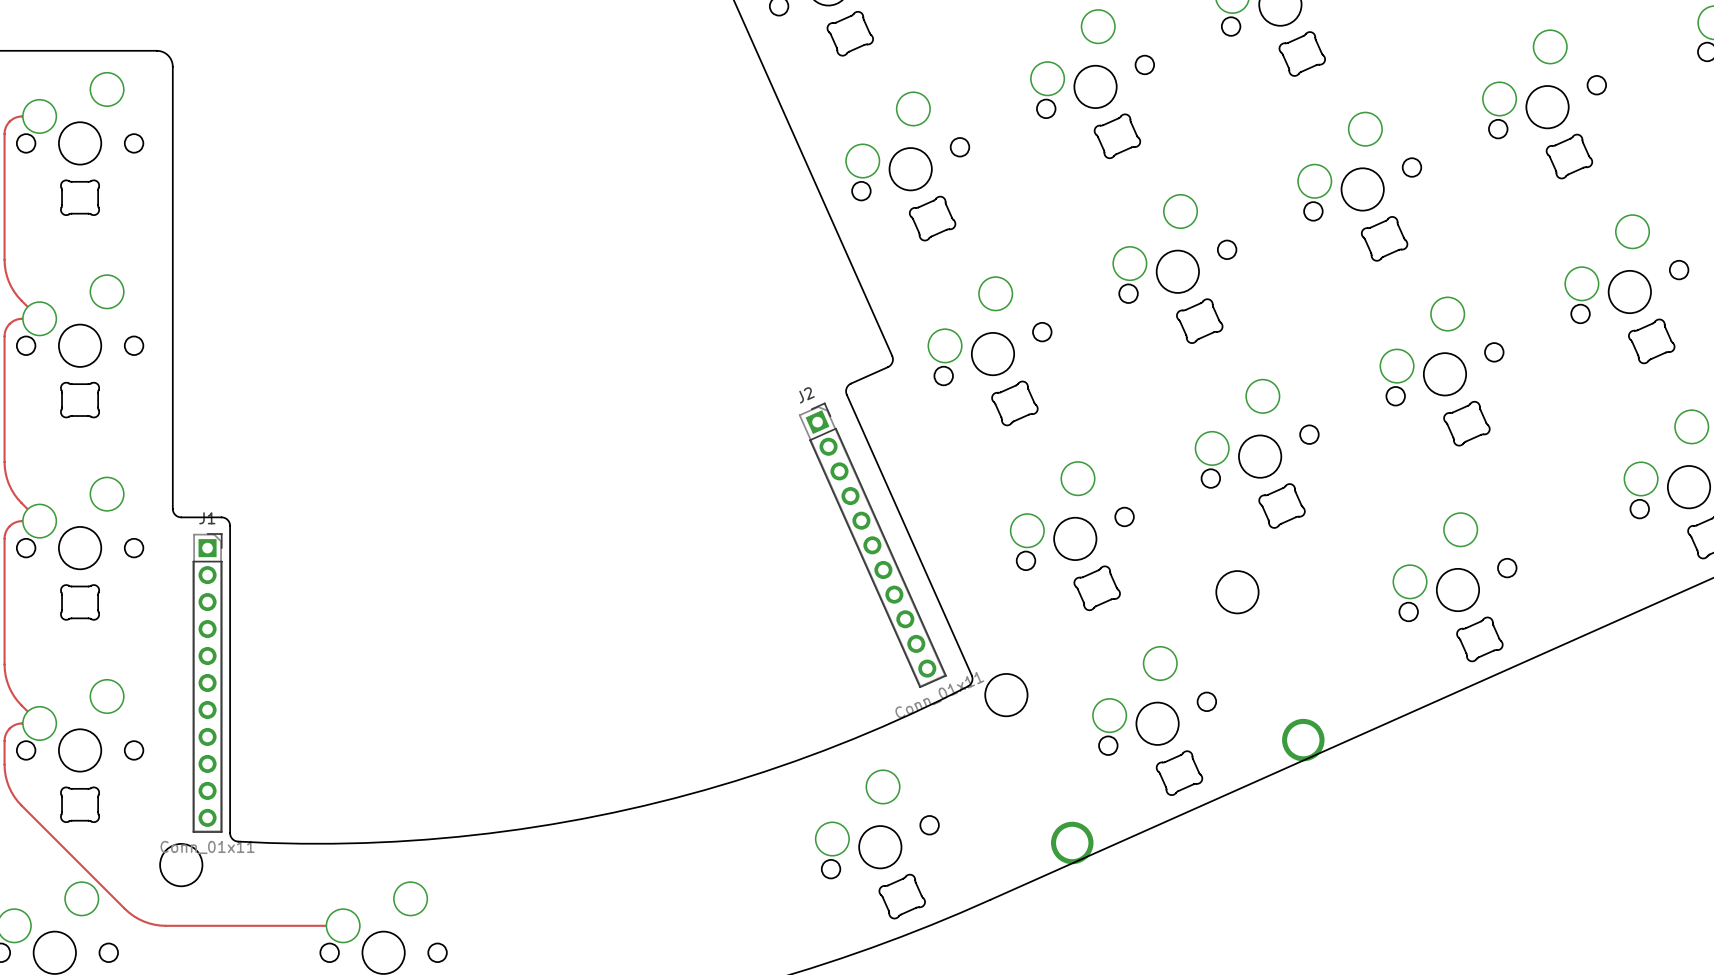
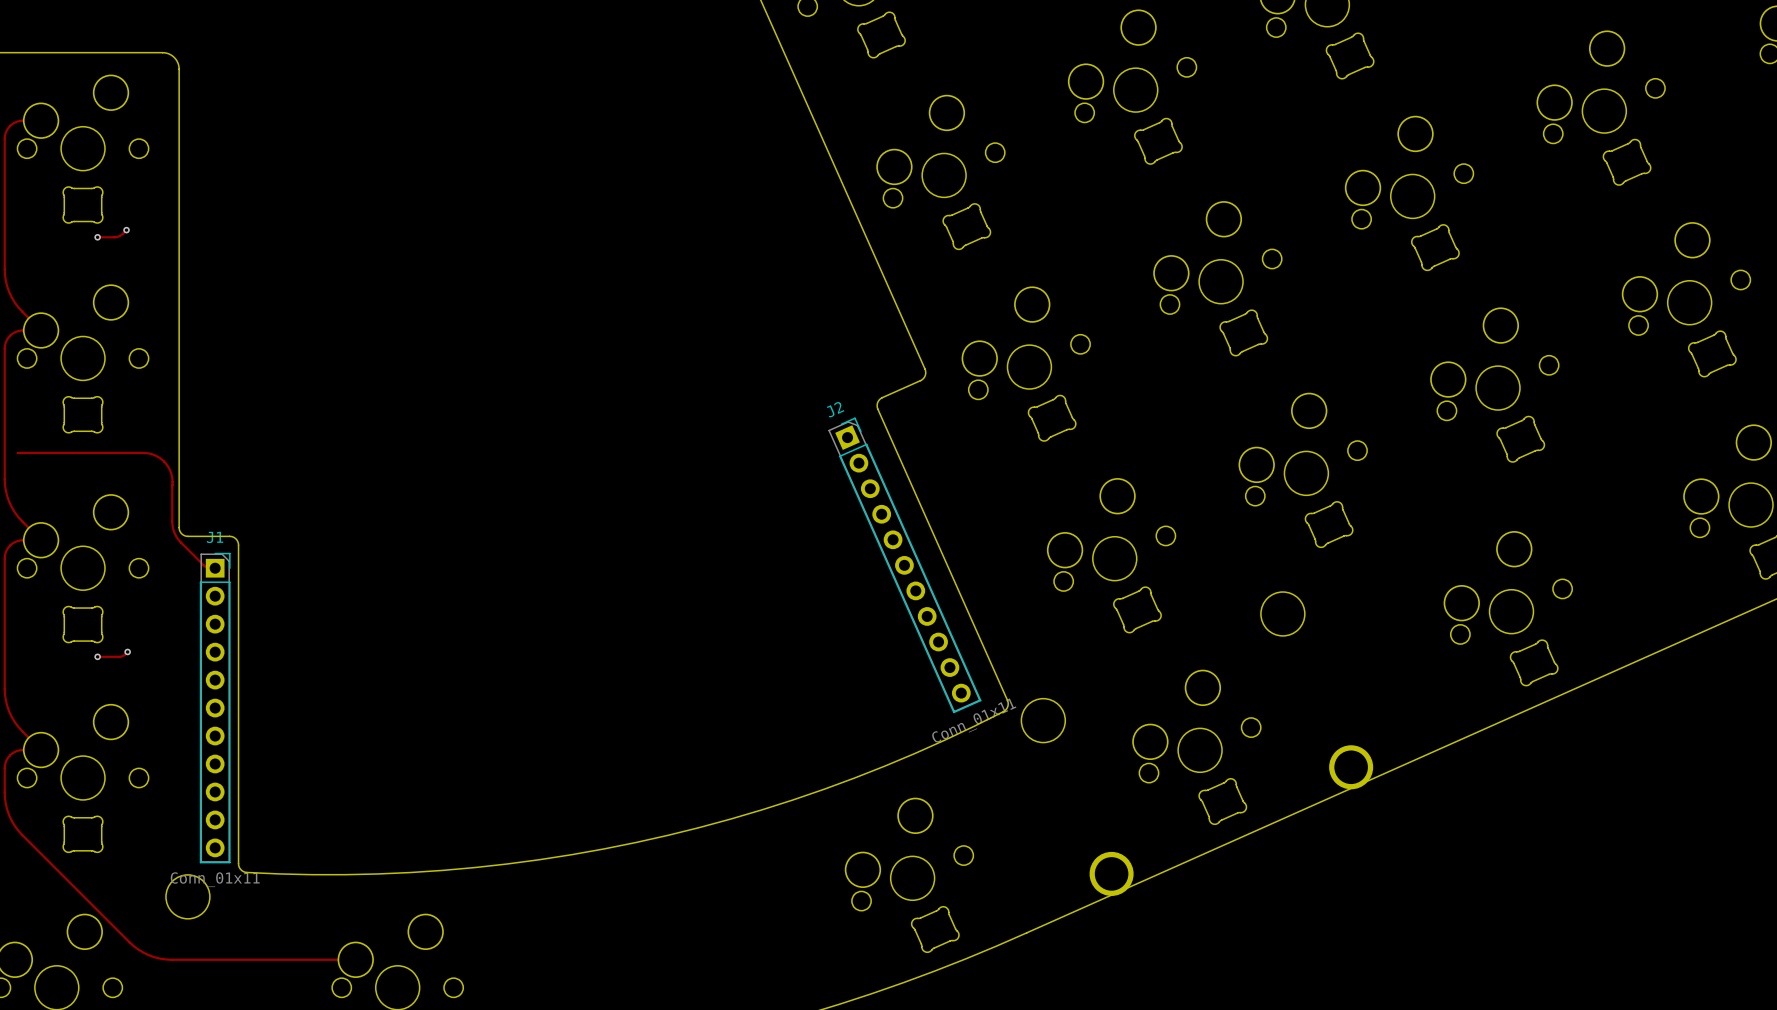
track: none -> (126, 230) (117, 236) (97, 237)
via: none -> (126, 230)
via: none -> (97, 237)
track: none -> (17, 452) (143, 452) (157, 456) (167, 465) (171, 476) (172, 525) (176, 536) (204, 566) (215, 568)
track: none -> (127, 651) (120, 656) (97, 656)
via: none -> (127, 651)
via: none -> (97, 656)

